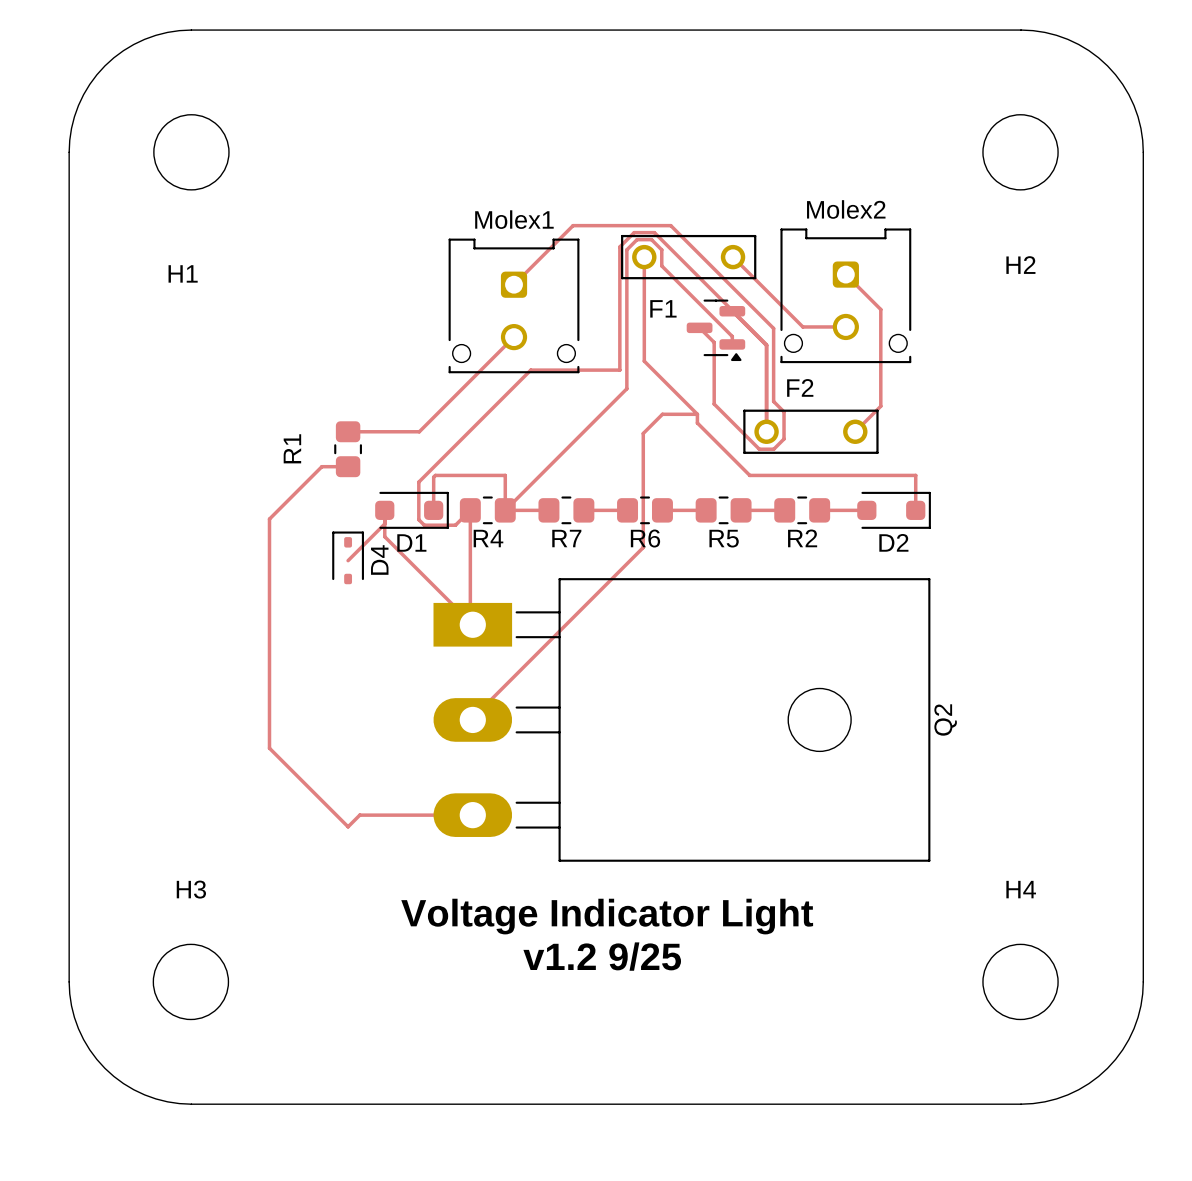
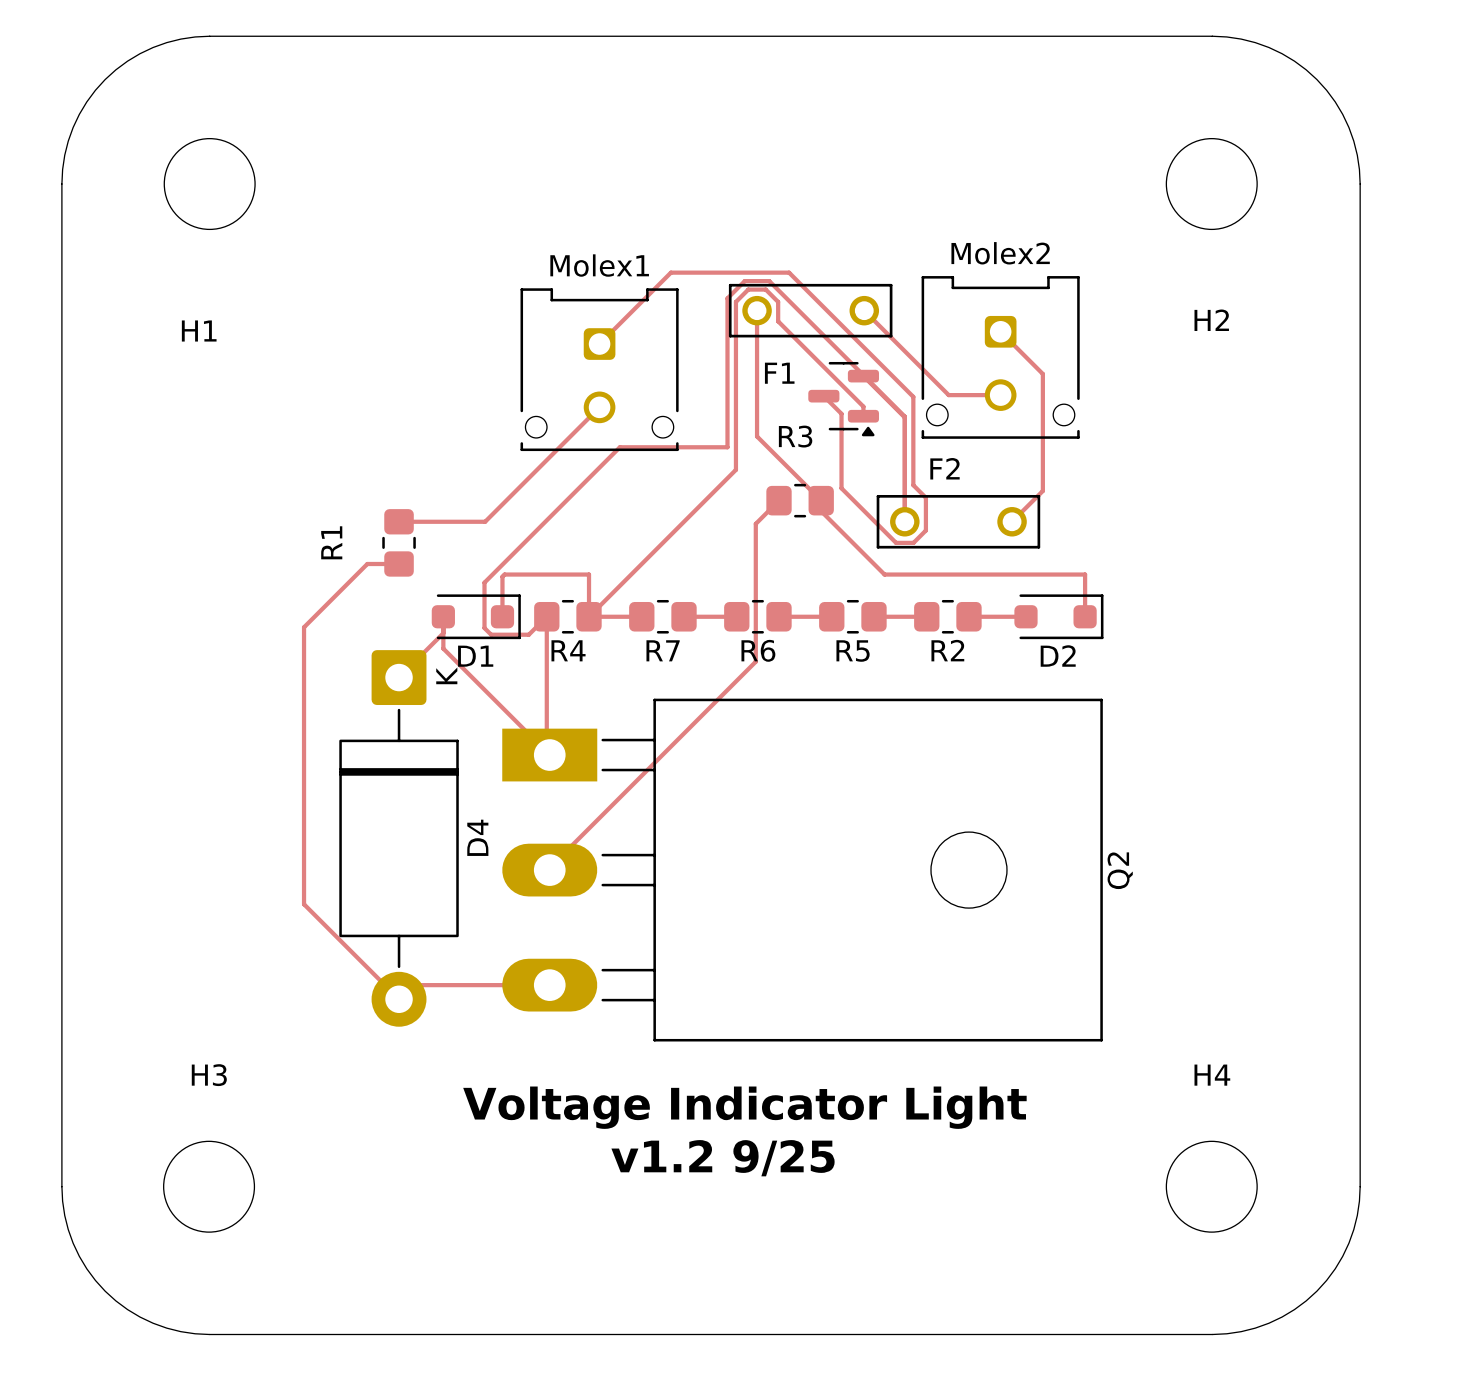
top track: (662, 414) (697, 414) -> none
R3: none -> (800, 500)
D4 footprint: [332, 531, 364, 585] -> [339, 650, 459, 1027]

